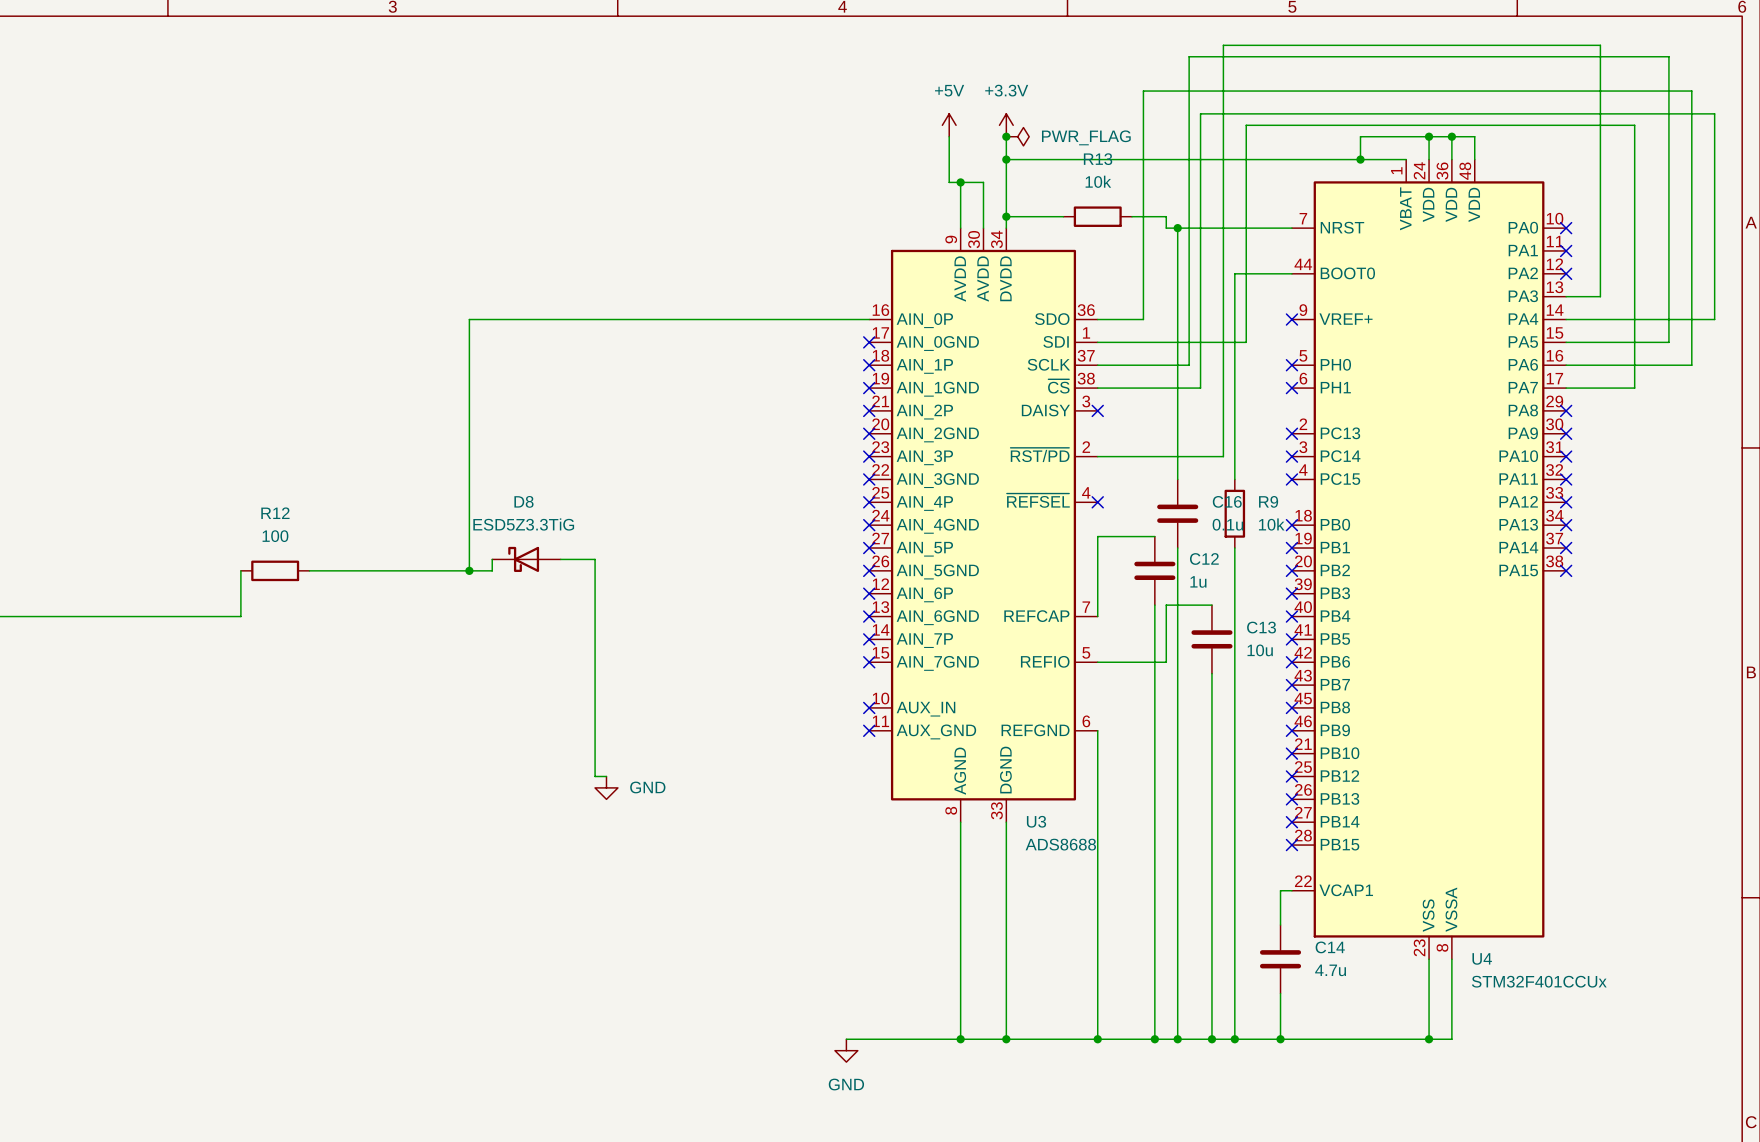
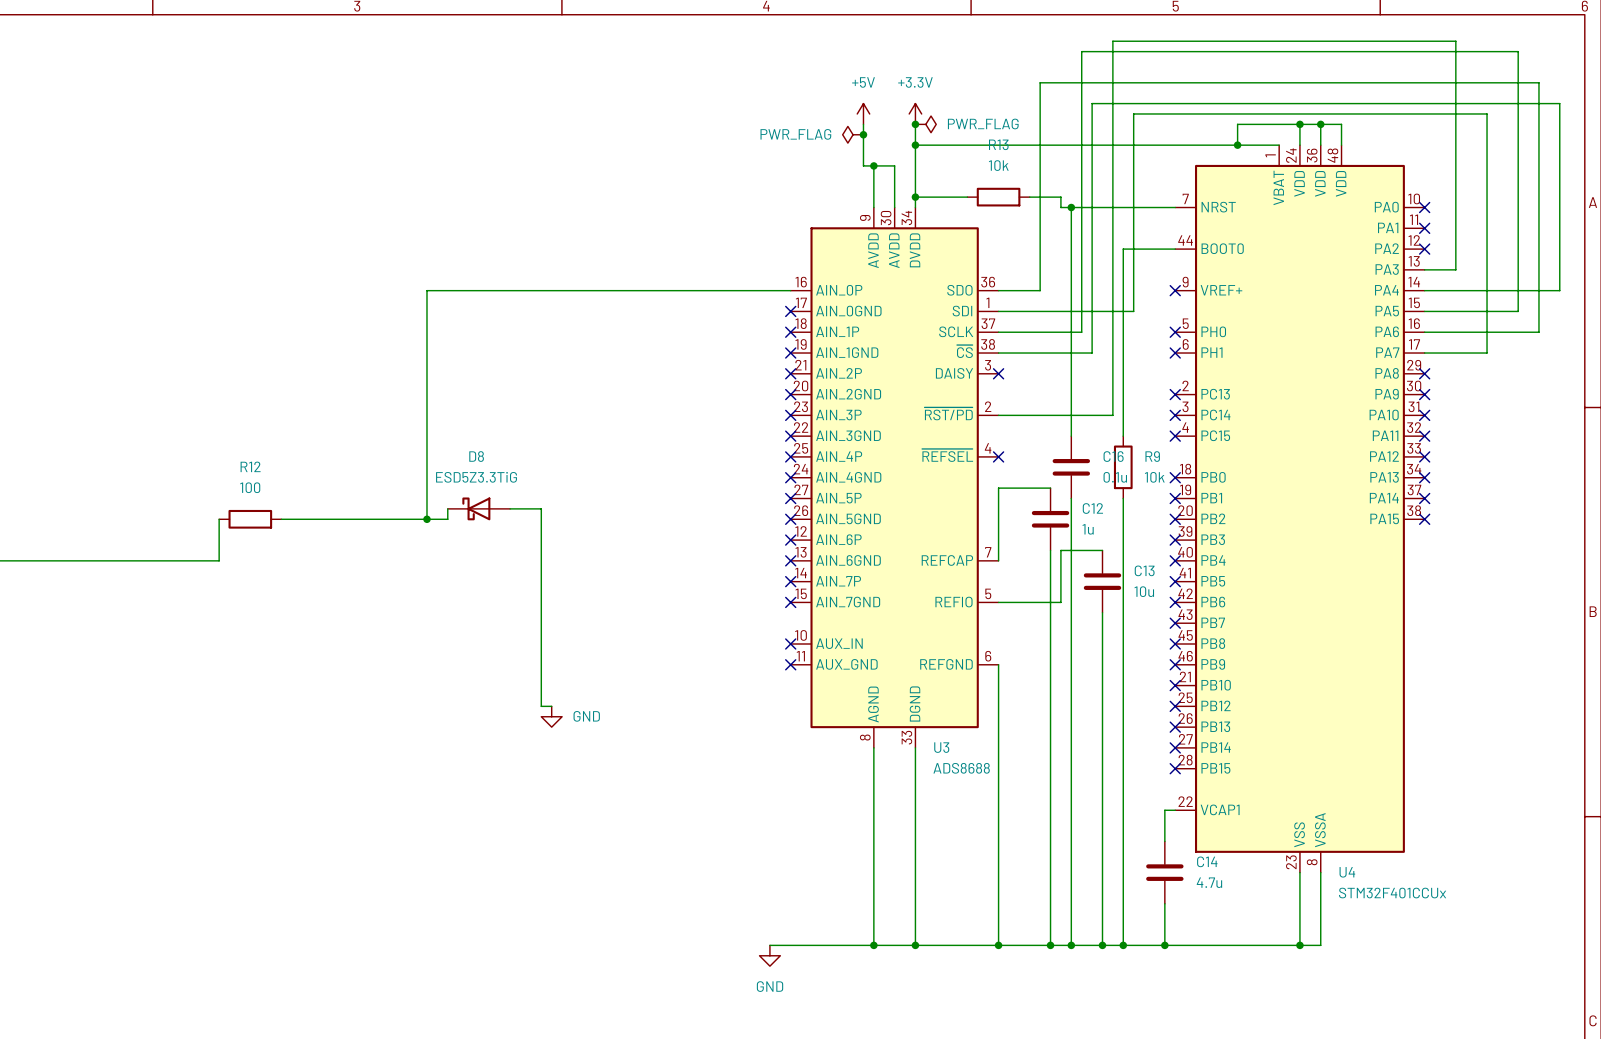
power symbol: none -> PWR_FLAG (853, 134)
junction: none -> (863, 134)

